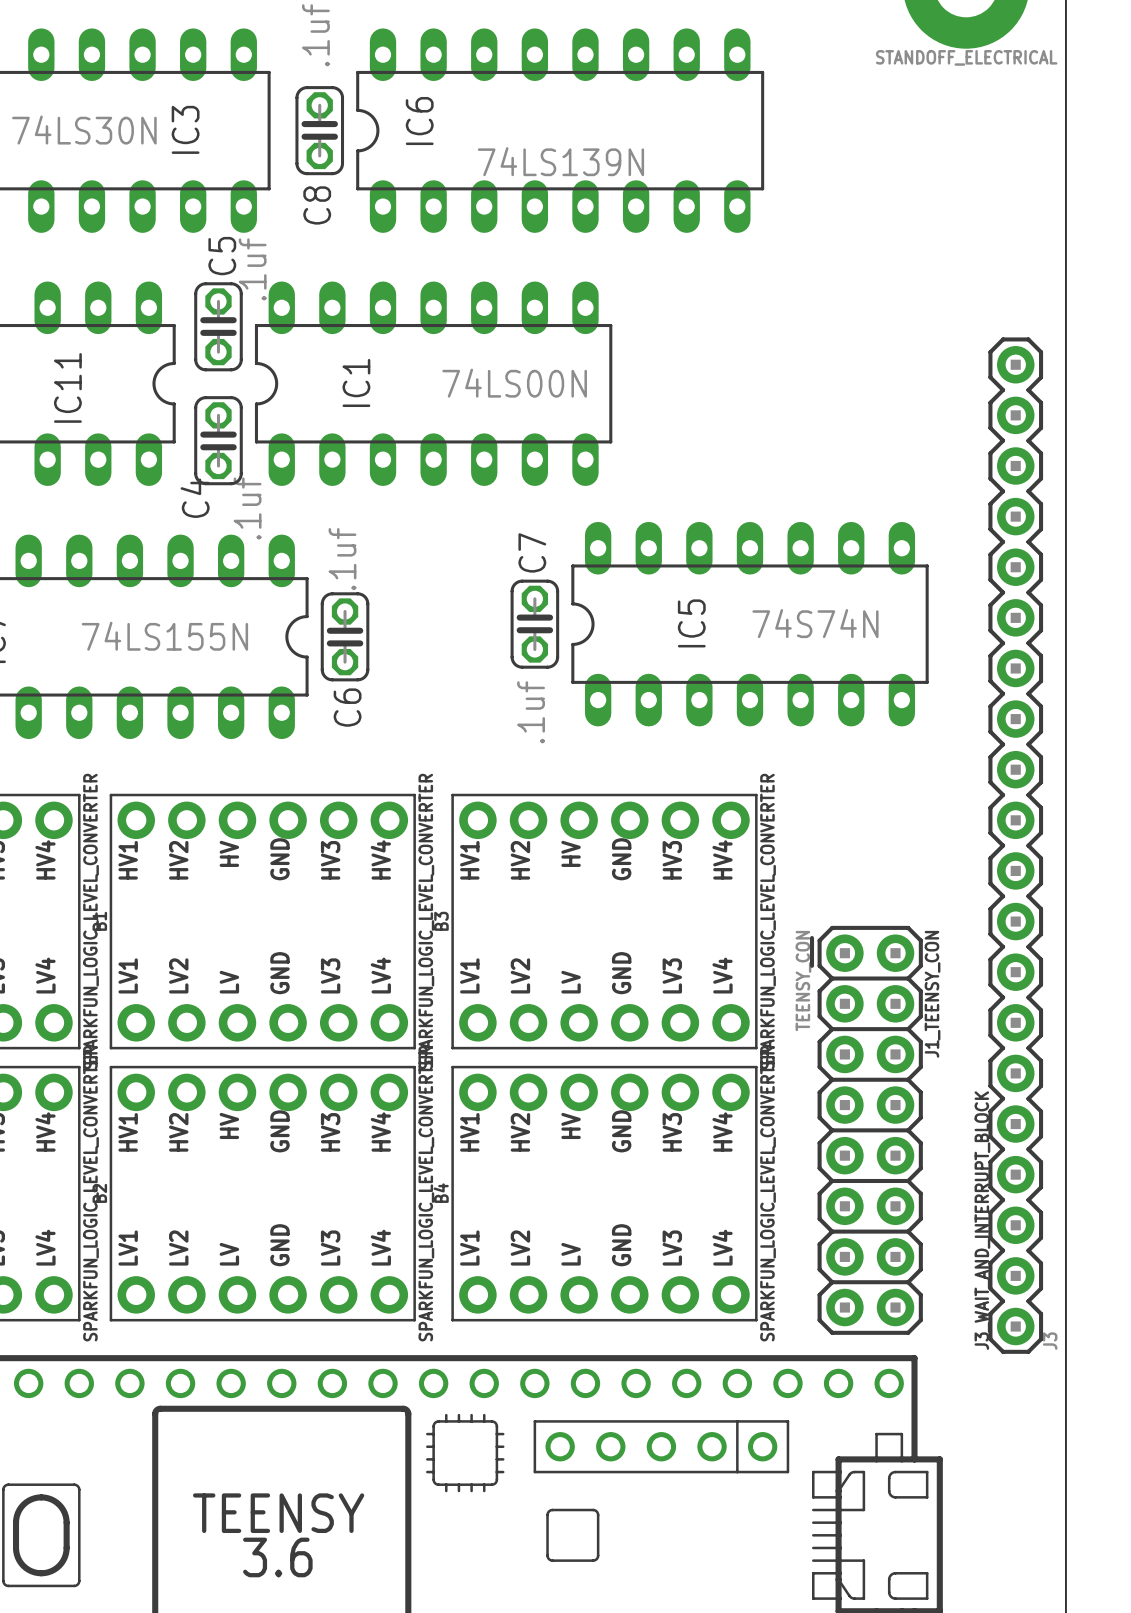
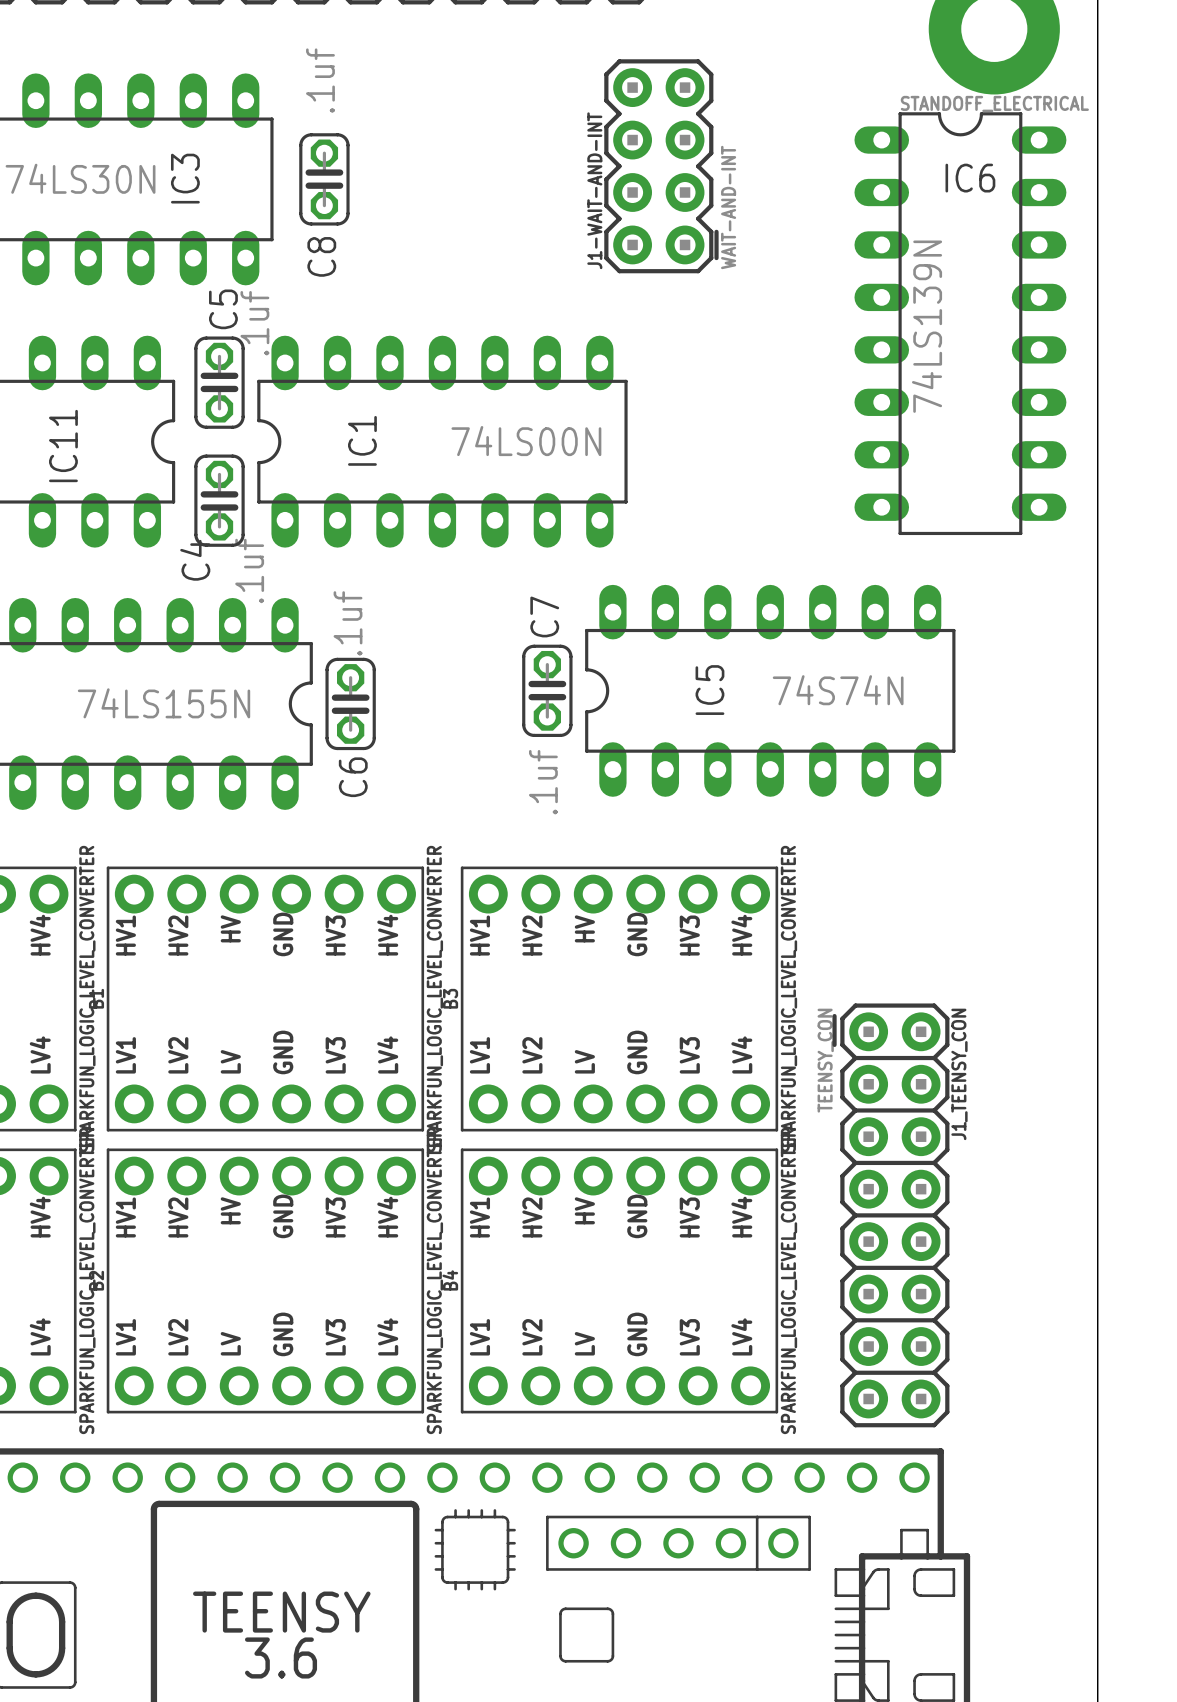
IC6 footprint: [356, 28, 765, 233] -> [854, 112, 1067, 536]
J1-WAIT-AND-INT: none -> WAIT-AND-INT (661, 166)
IC6 name position: IC6 (419, 121) -> IC6 (970, 178)
IC6 value position: 74LS139N (560, 161) -> 74LS139N (927, 326)
J3_WAIT_AND_INTERRUPT_BLOCK: J3 (1015, 845) -> none

